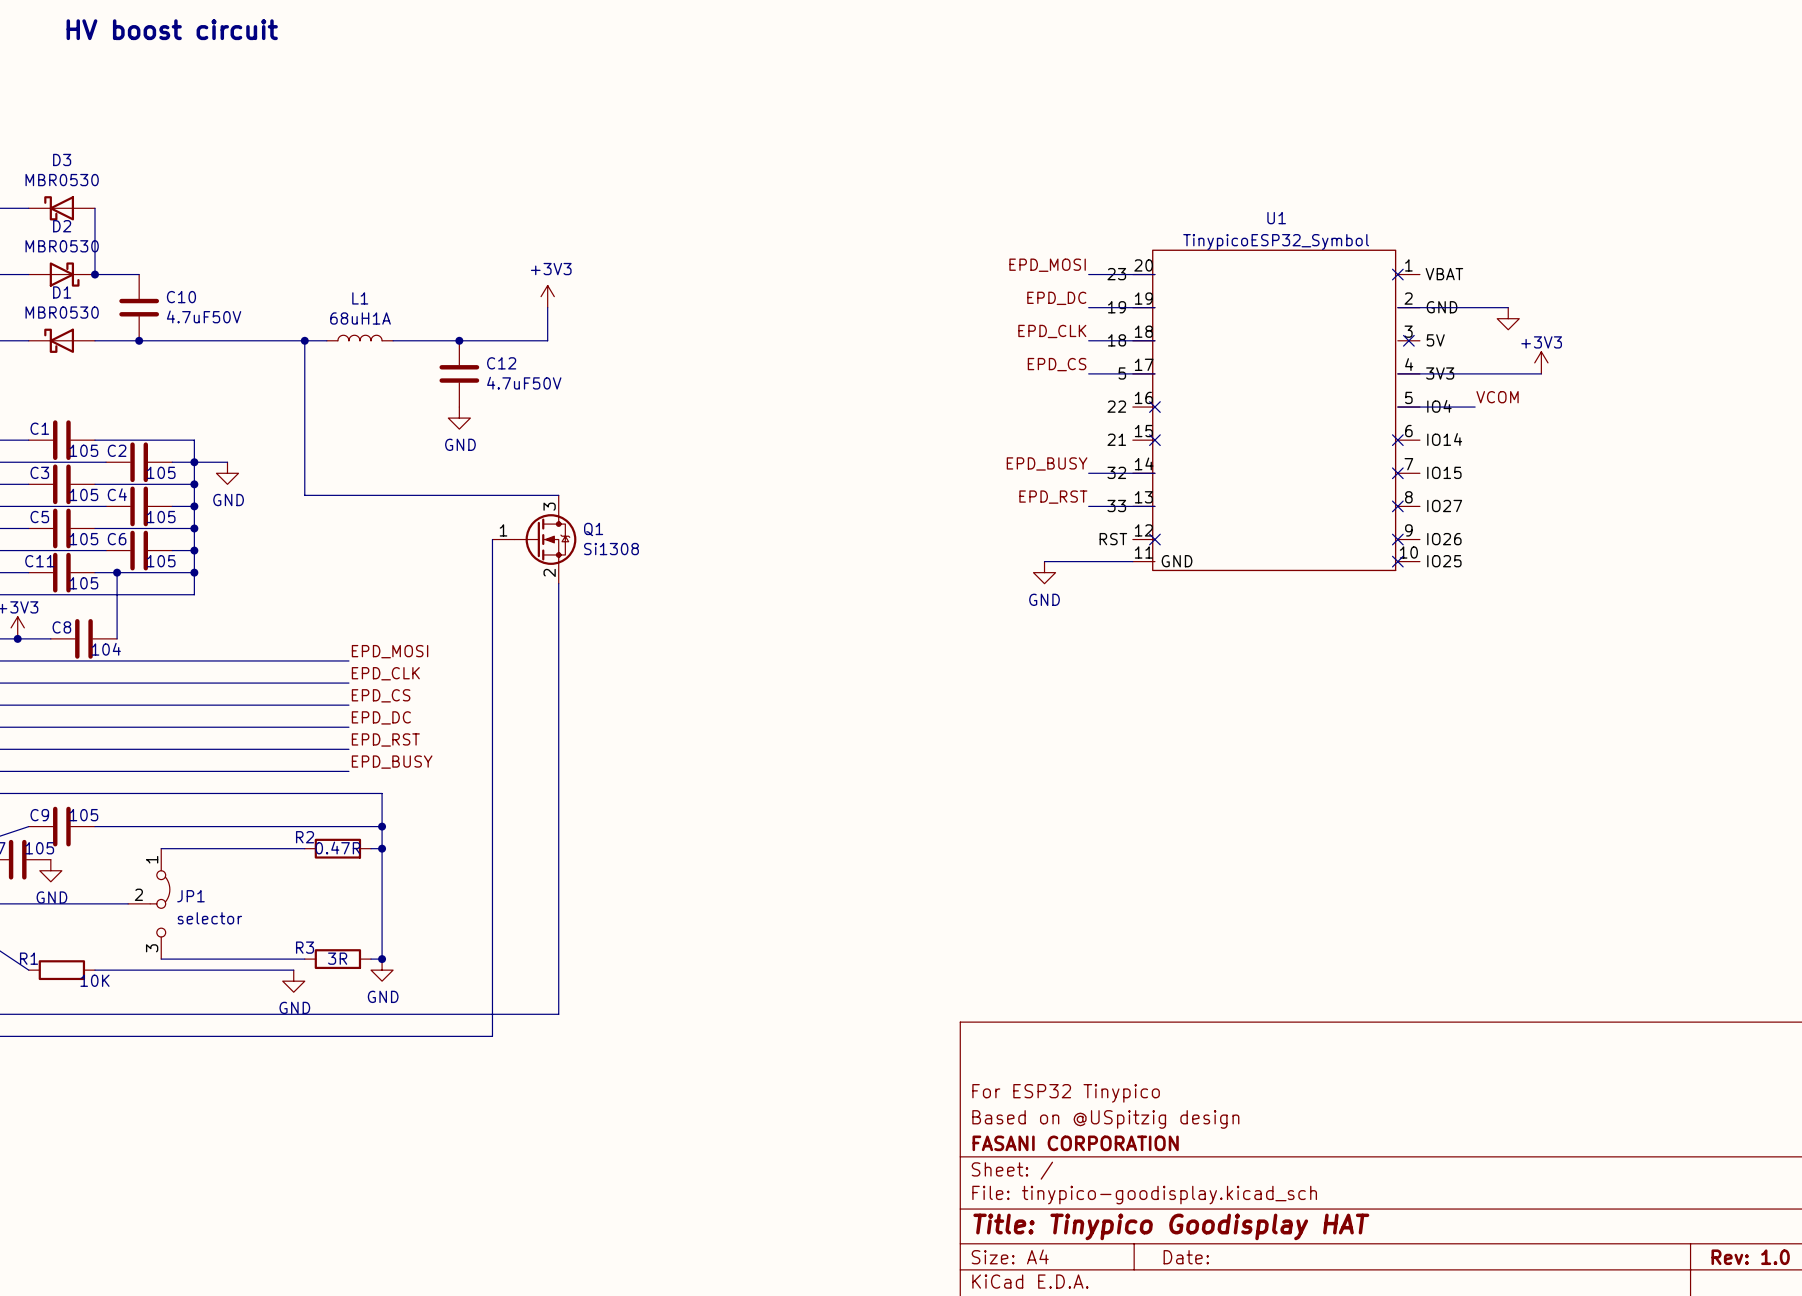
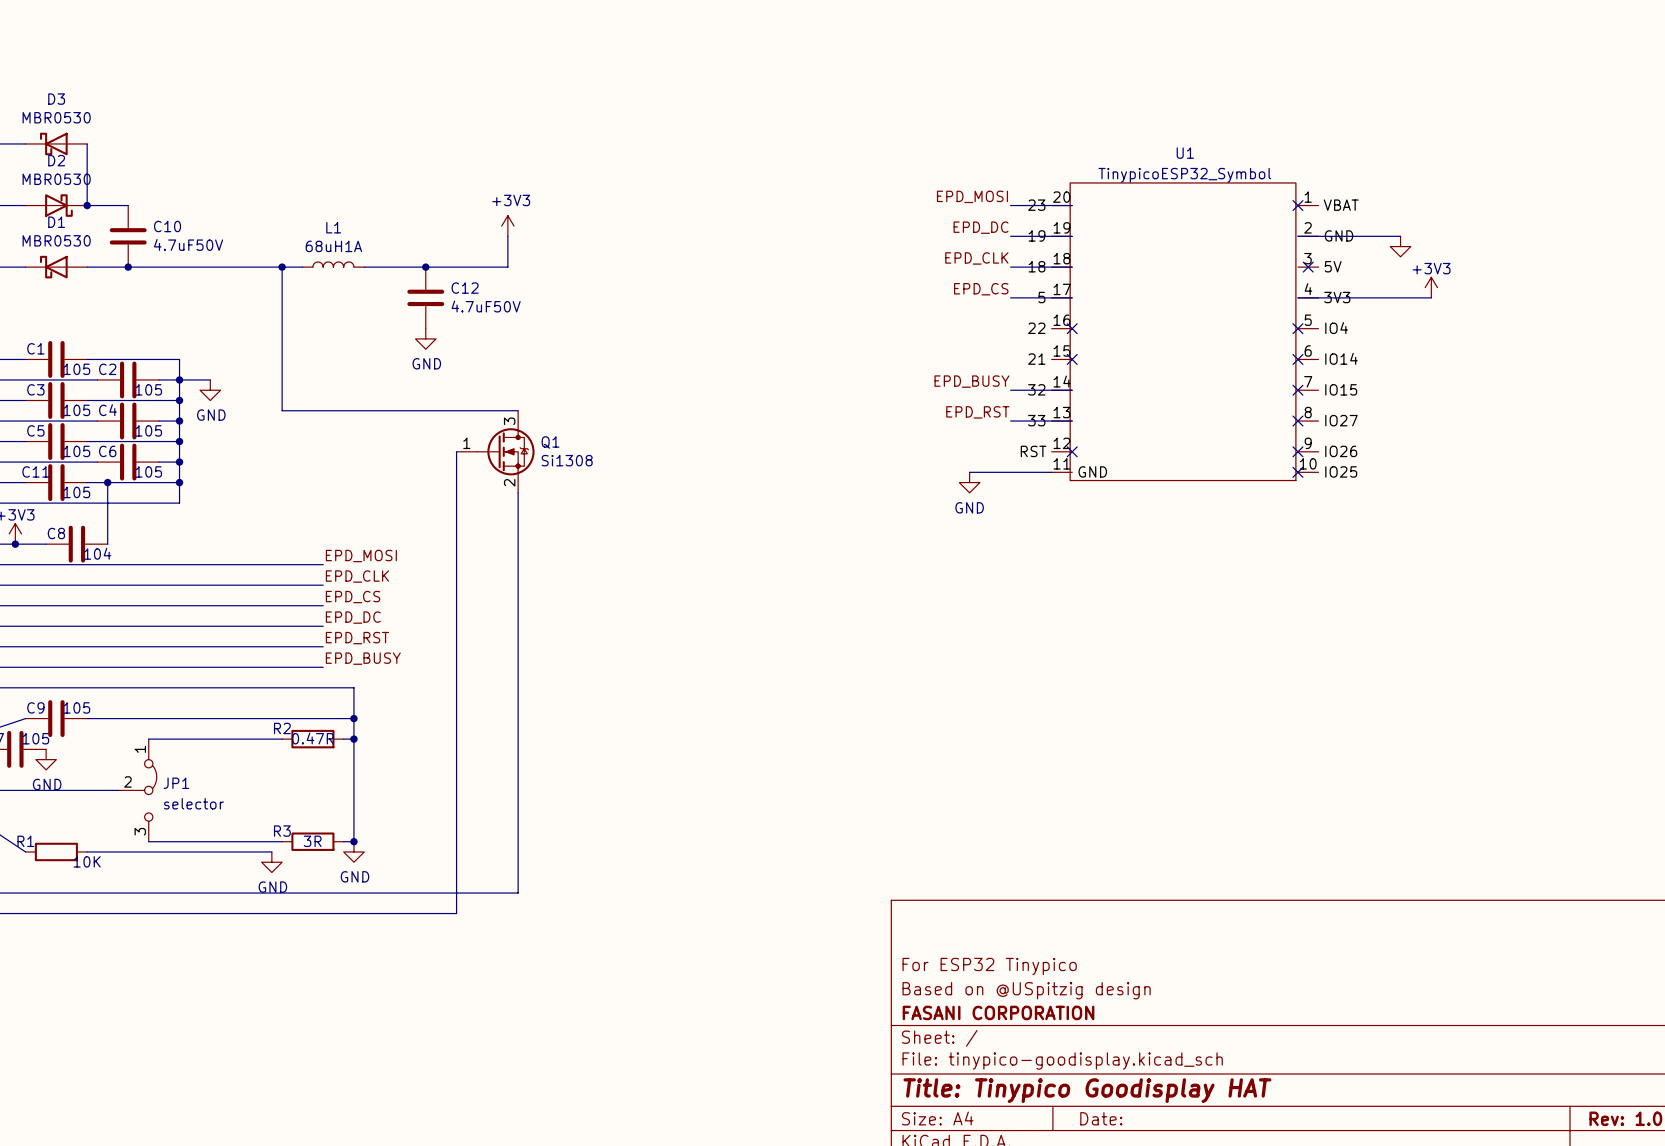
label: VCOM (1497, 397) -> none
wire: (1397, 407) (1475, 407) -> none
no-connect mark: none -> (1297, 328)

